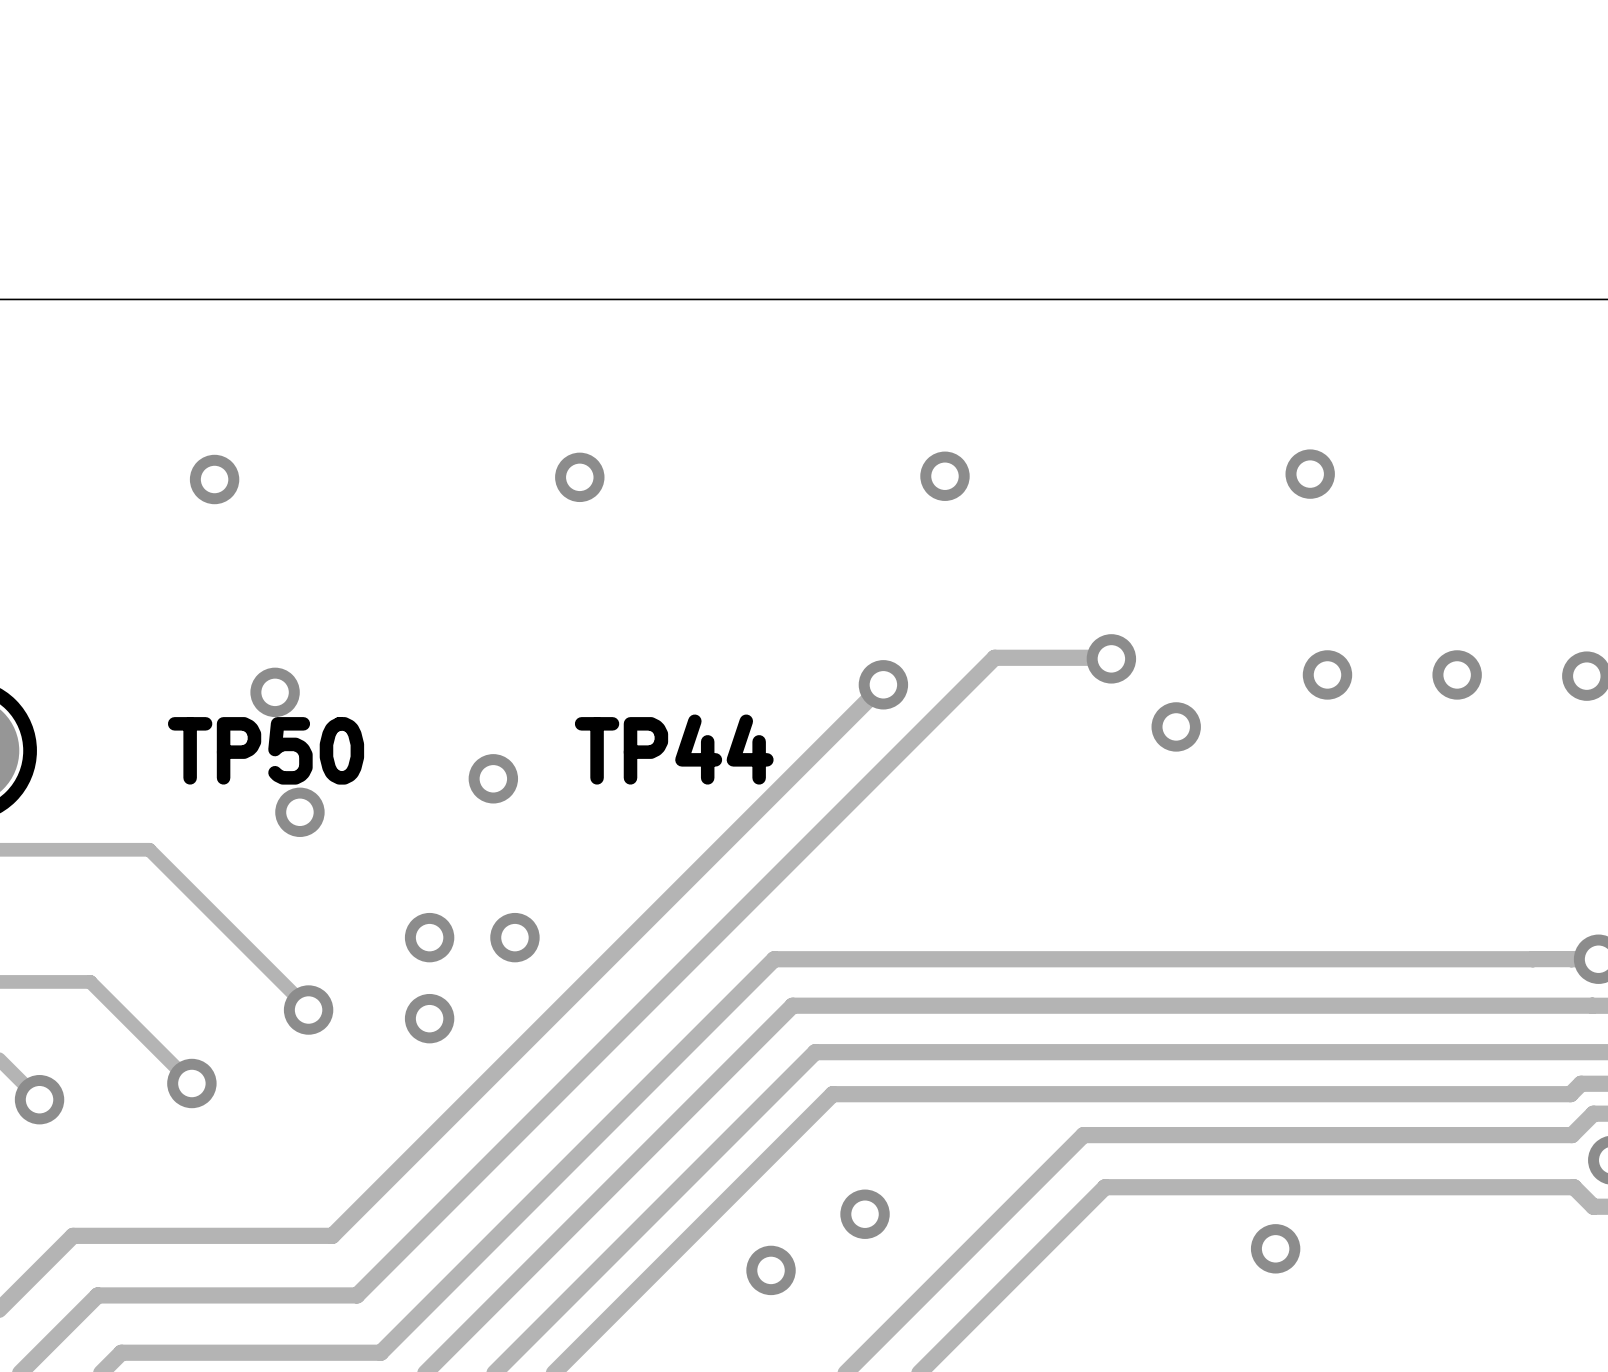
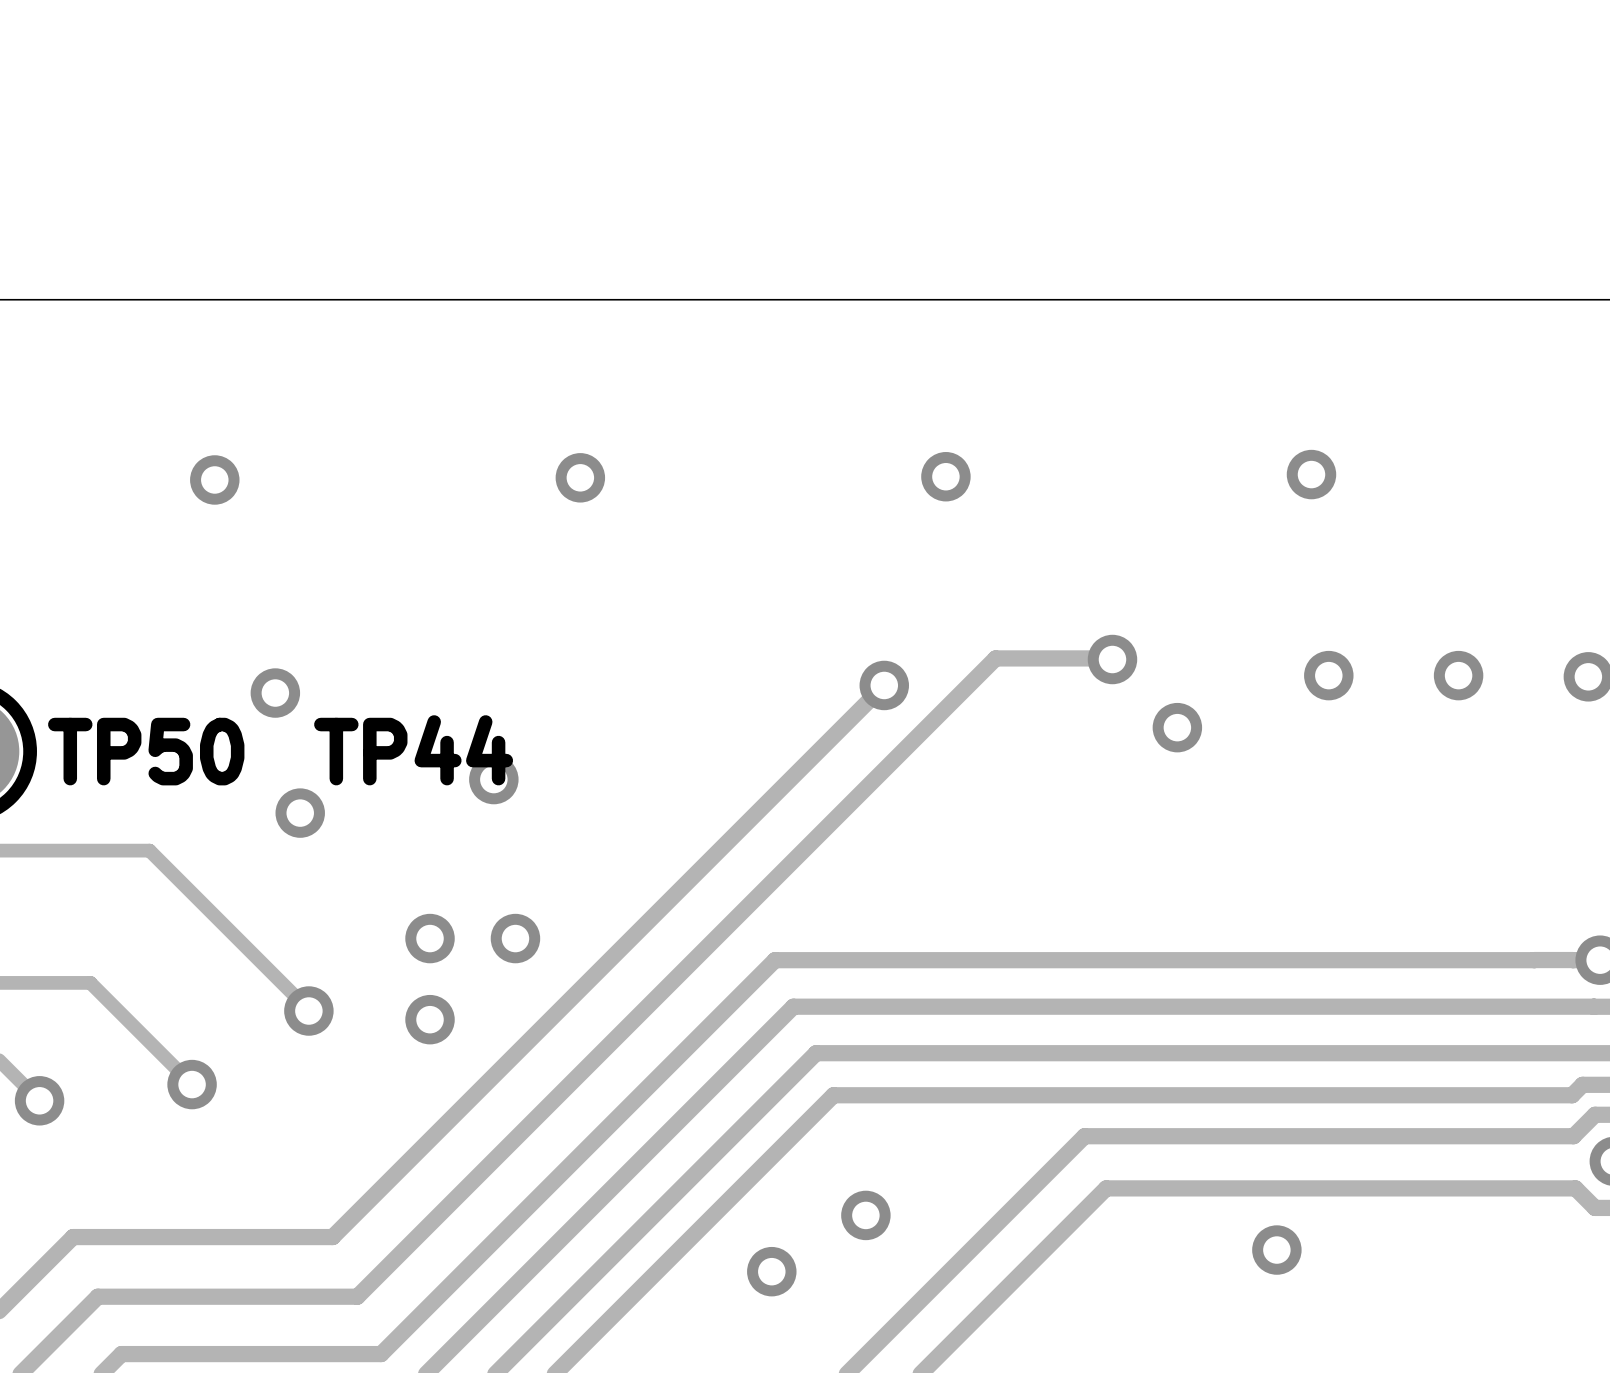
TP44 name position: TP44 (674, 749) -> TP44 (413, 750)
TP50 name position: TP50 (266, 750) -> TP50 (146, 751)

